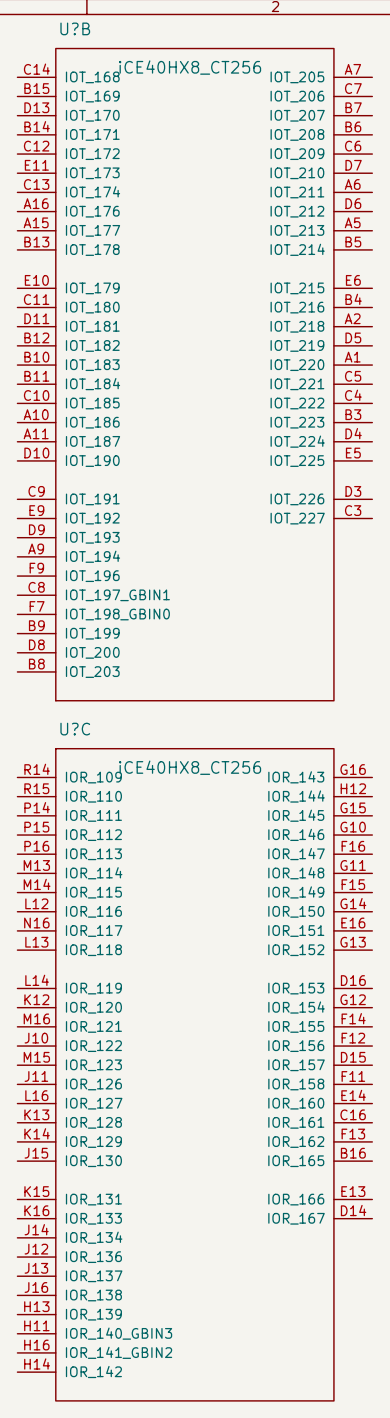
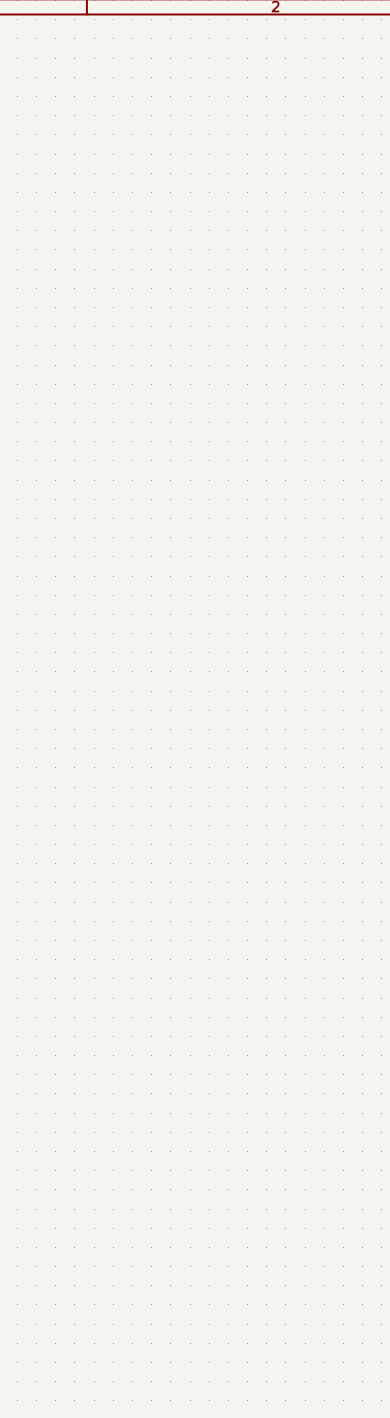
U?B: iCE40HX8_CT256 (194, 374) -> none
U?C: iCE40HX8_CT256 (194, 1074) -> none

